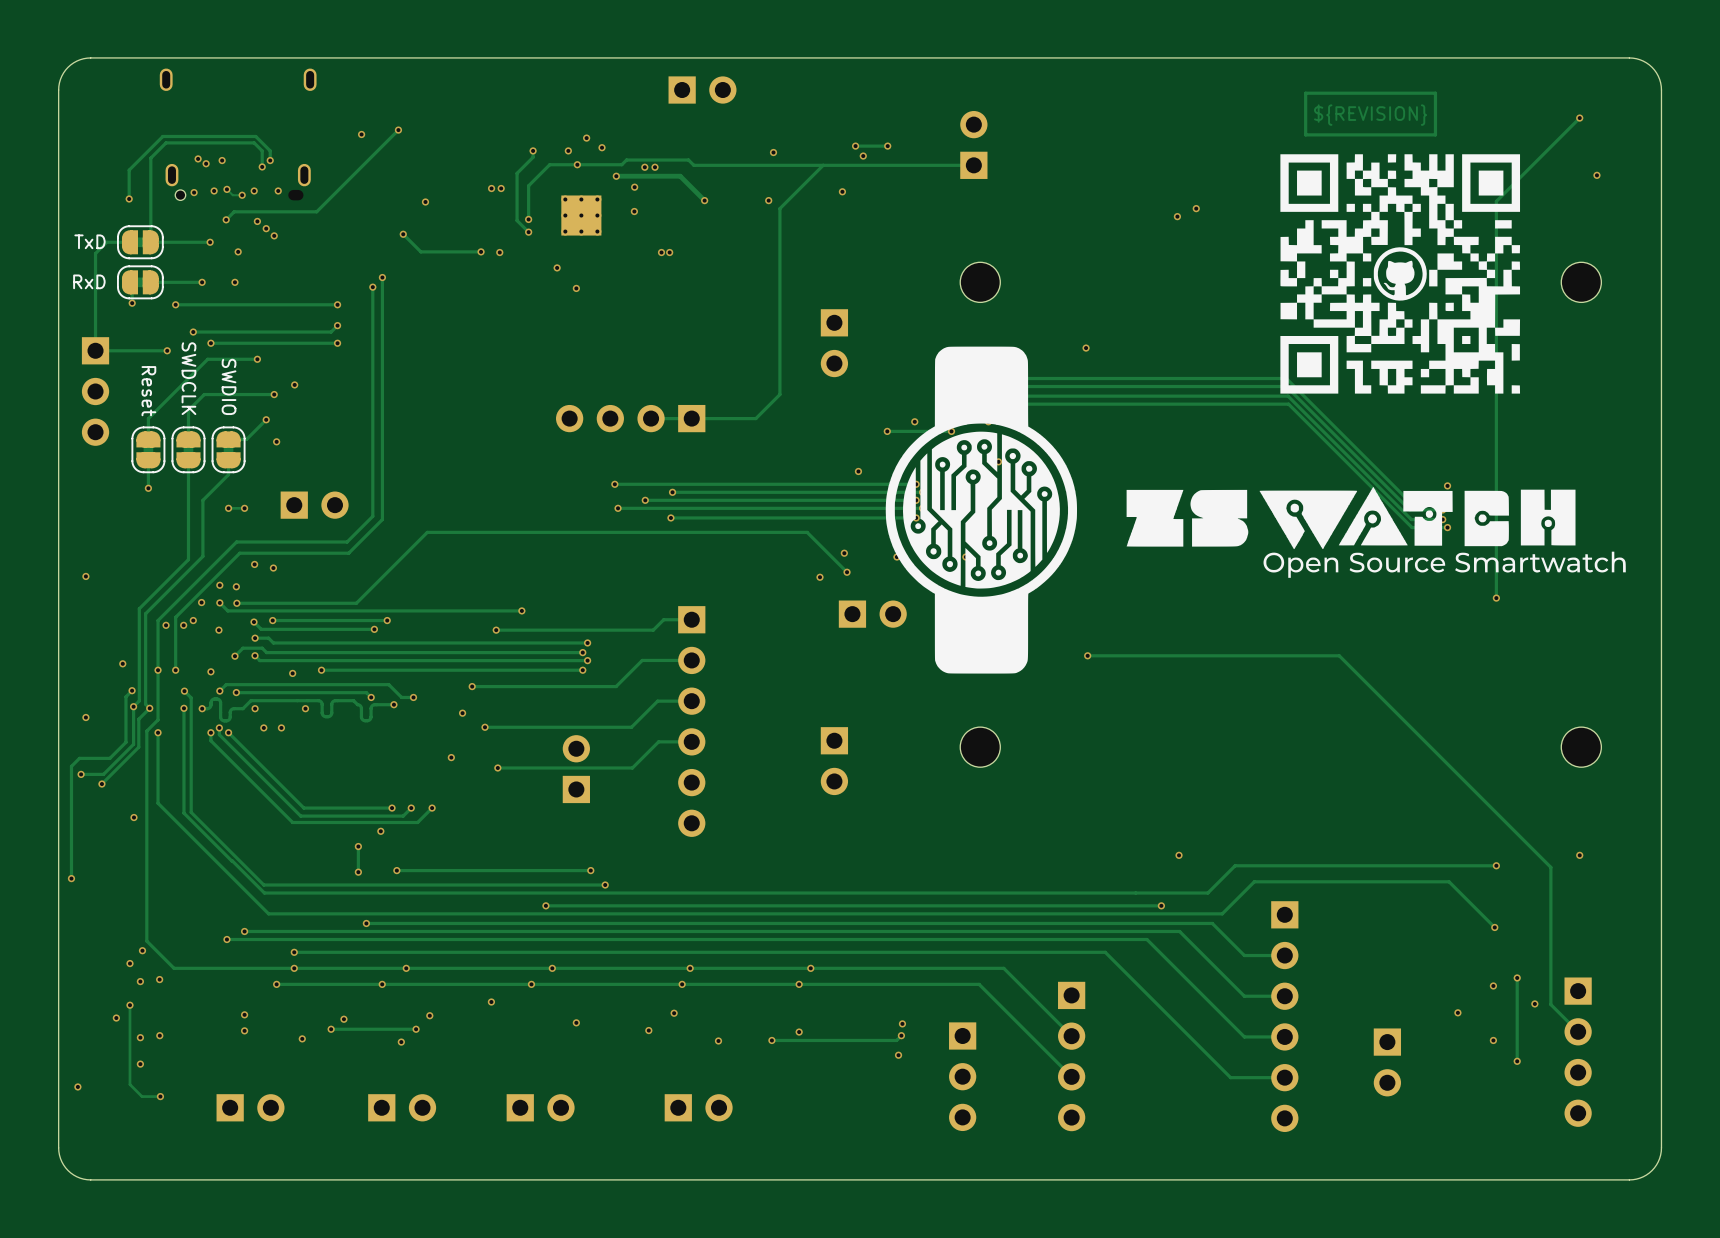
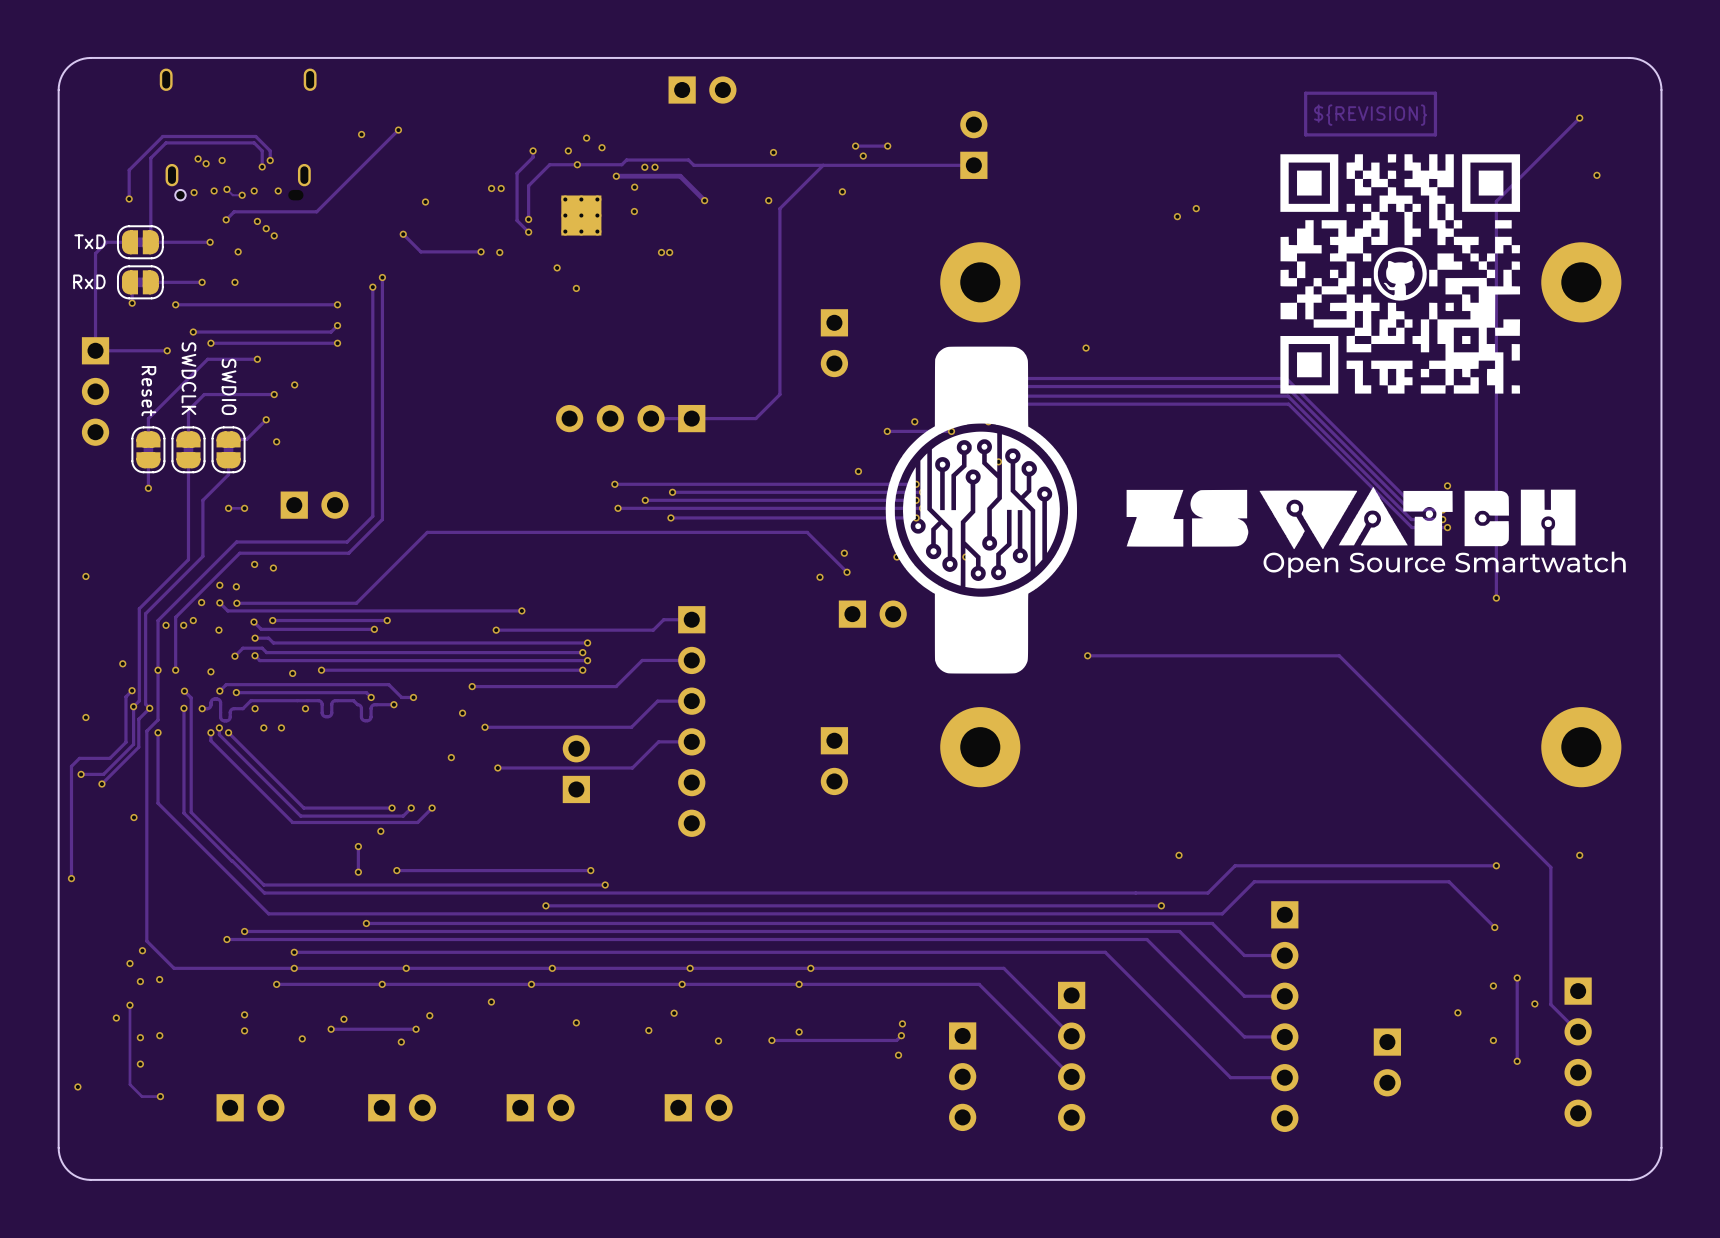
part footprint: [960, 262, 1001, 303] -> [940, 242, 1021, 323]
part footprint: [1561, 262, 1602, 303] -> [1541, 242, 1622, 323]
part footprint: [960, 727, 1001, 768] -> [940, 707, 1021, 788]
part footprint: [1561, 727, 1602, 768] -> [1541, 707, 1622, 788]

